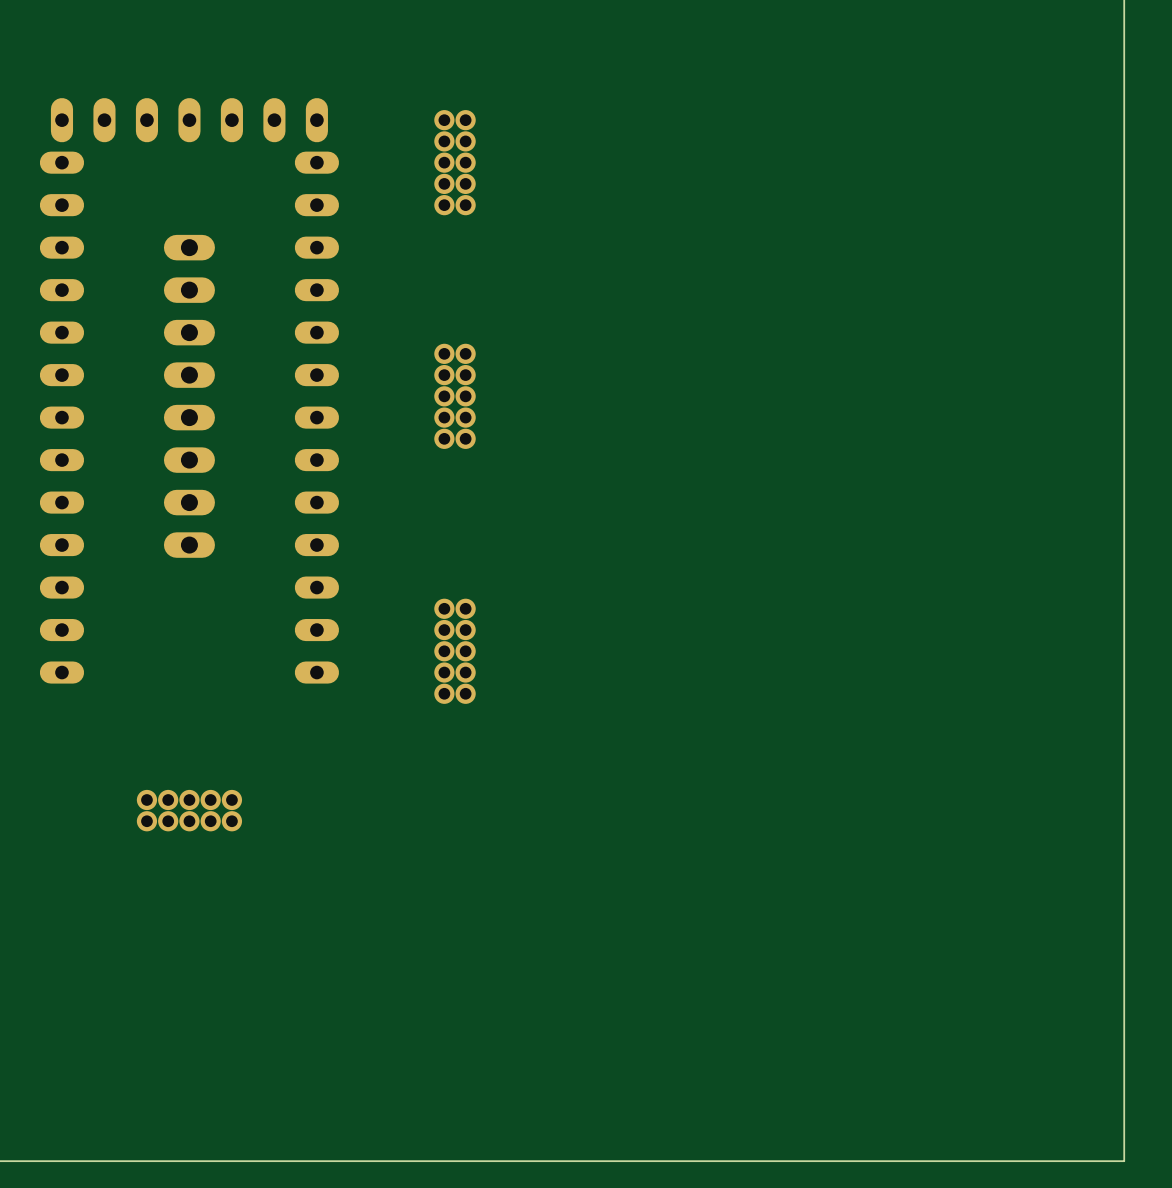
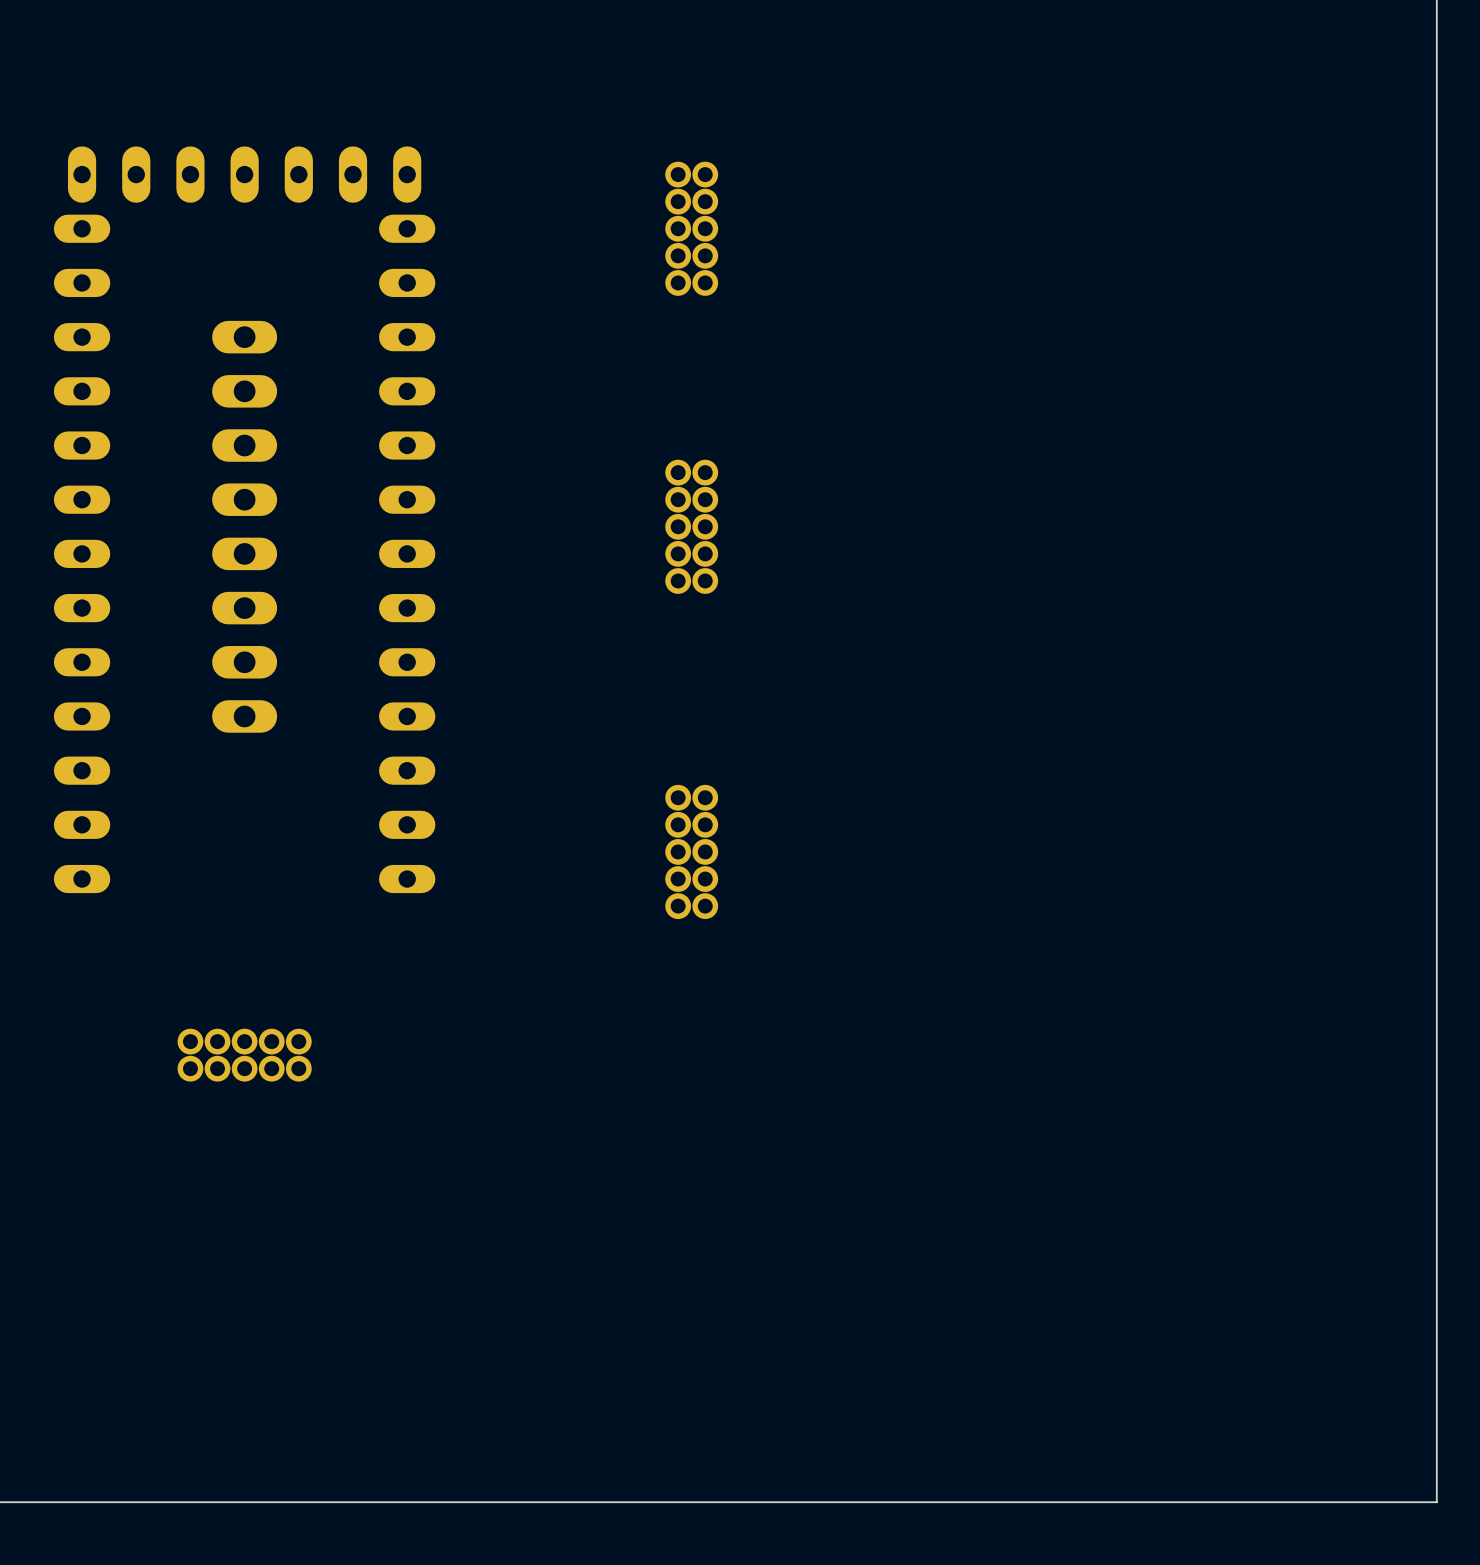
part: (444, 162) -> none
part: (465, 162) -> none
part: none -> (678, 228)
part: none -> (705, 228)
part: (444, 396) -> none
part: (465, 396) -> none
part: none -> (678, 526)
part: none -> (705, 526)
part: (444, 651) -> none
part: (465, 651) -> none
part: none -> (678, 851)
part: none -> (705, 851)

